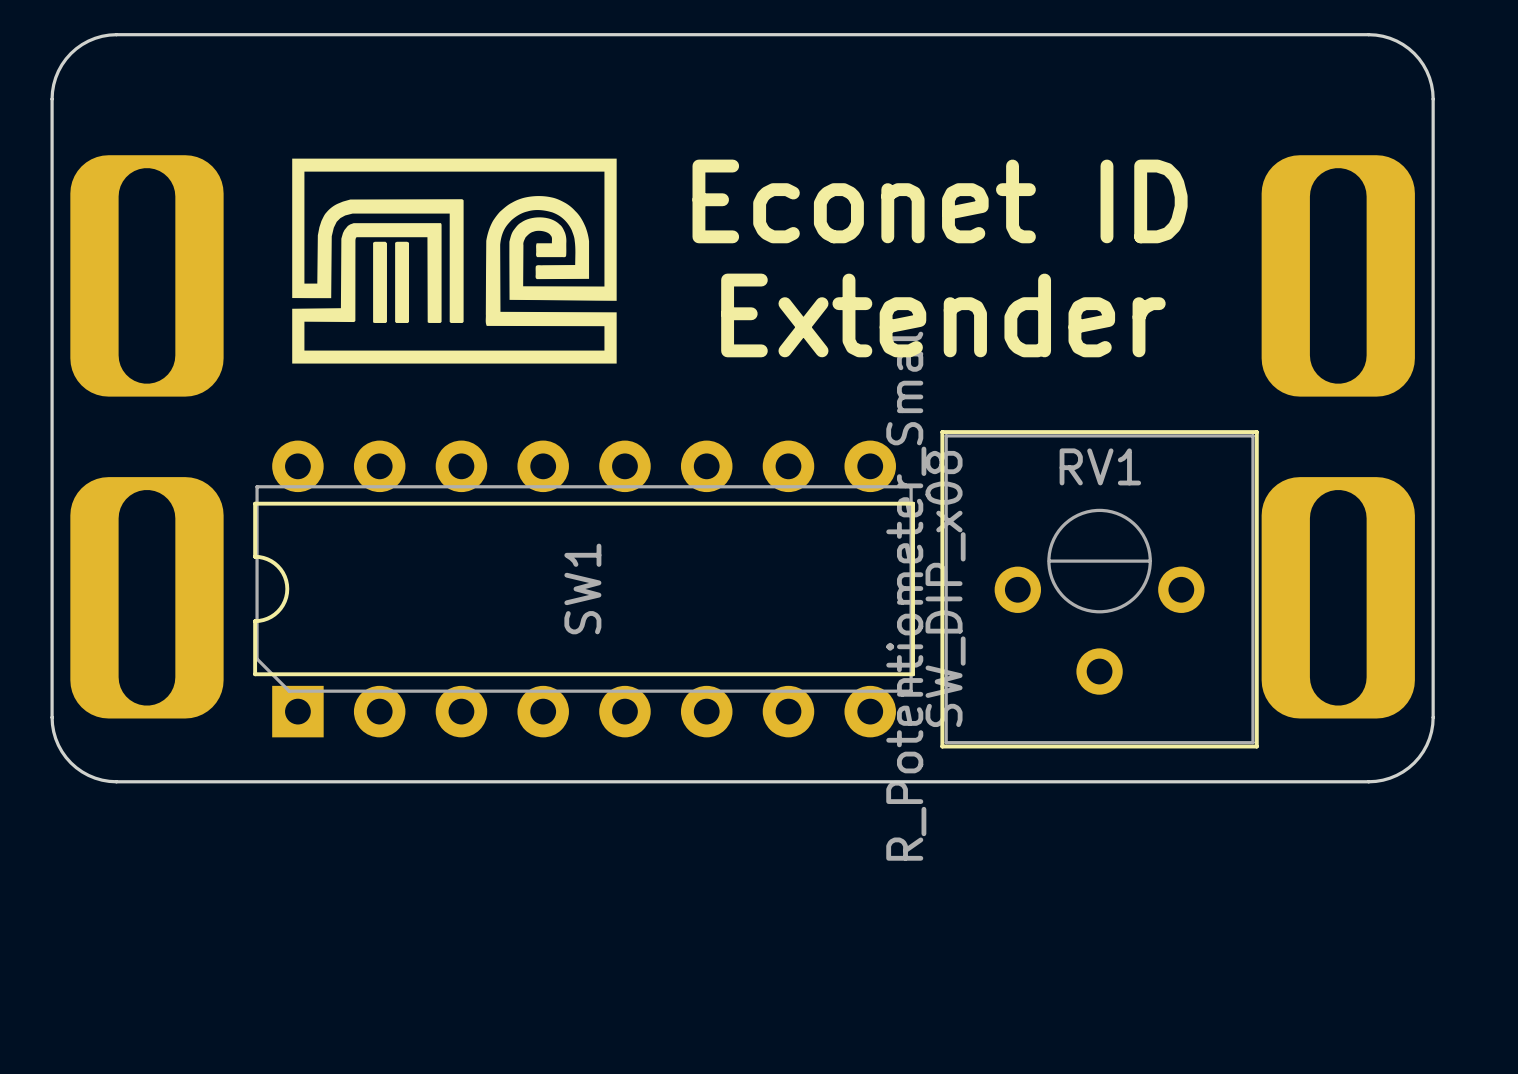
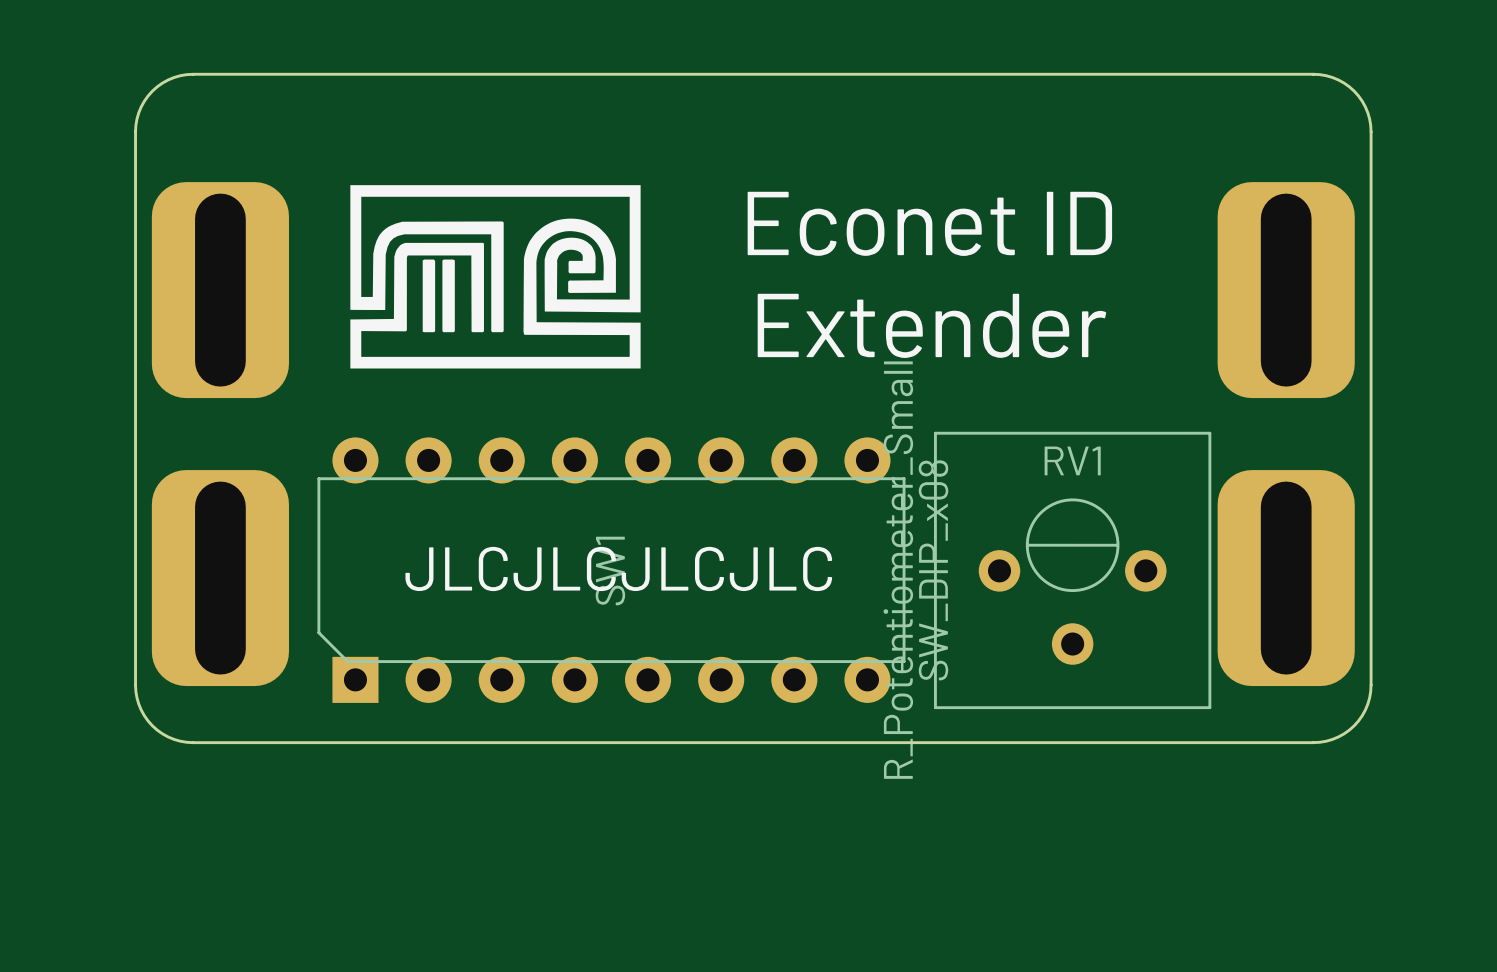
RV1 footprint: [940, 430, 1259, 749] -> [933, 431, 1212, 710]
SW1 footprint: [253, 440, 915, 738] -> [317, 437, 906, 703]
text: none -> JLCJLCJLCJLC (618, 568)

